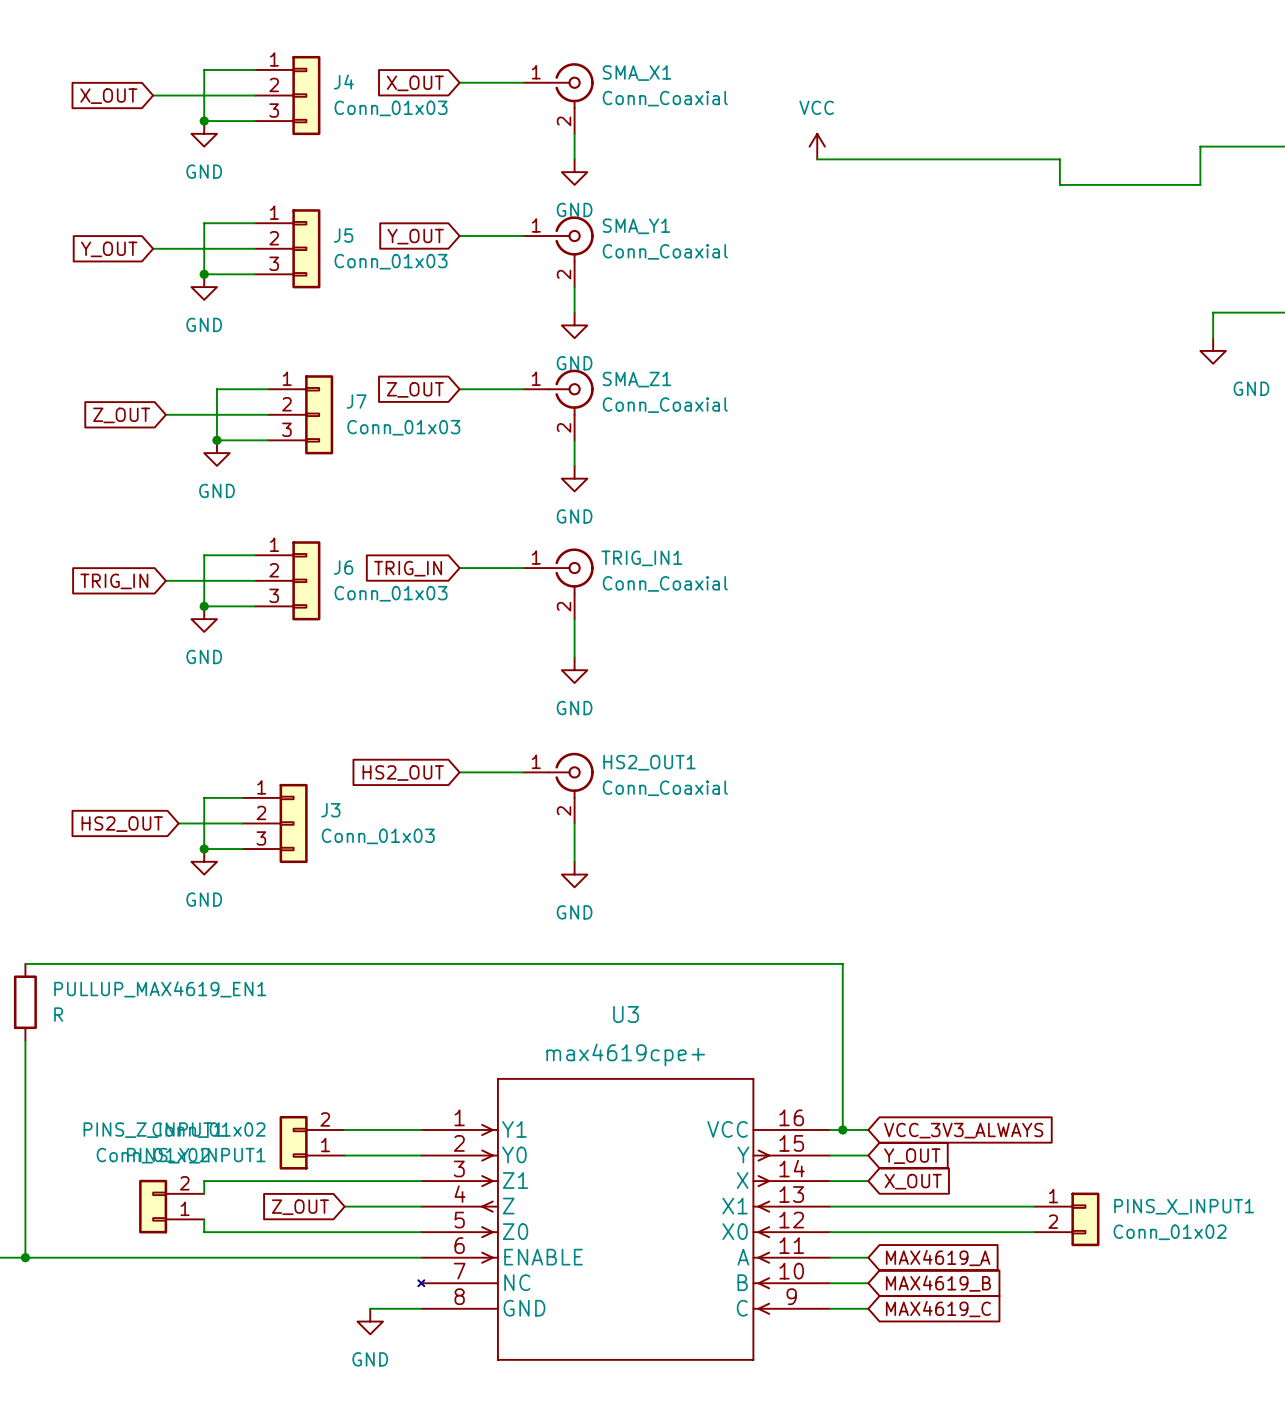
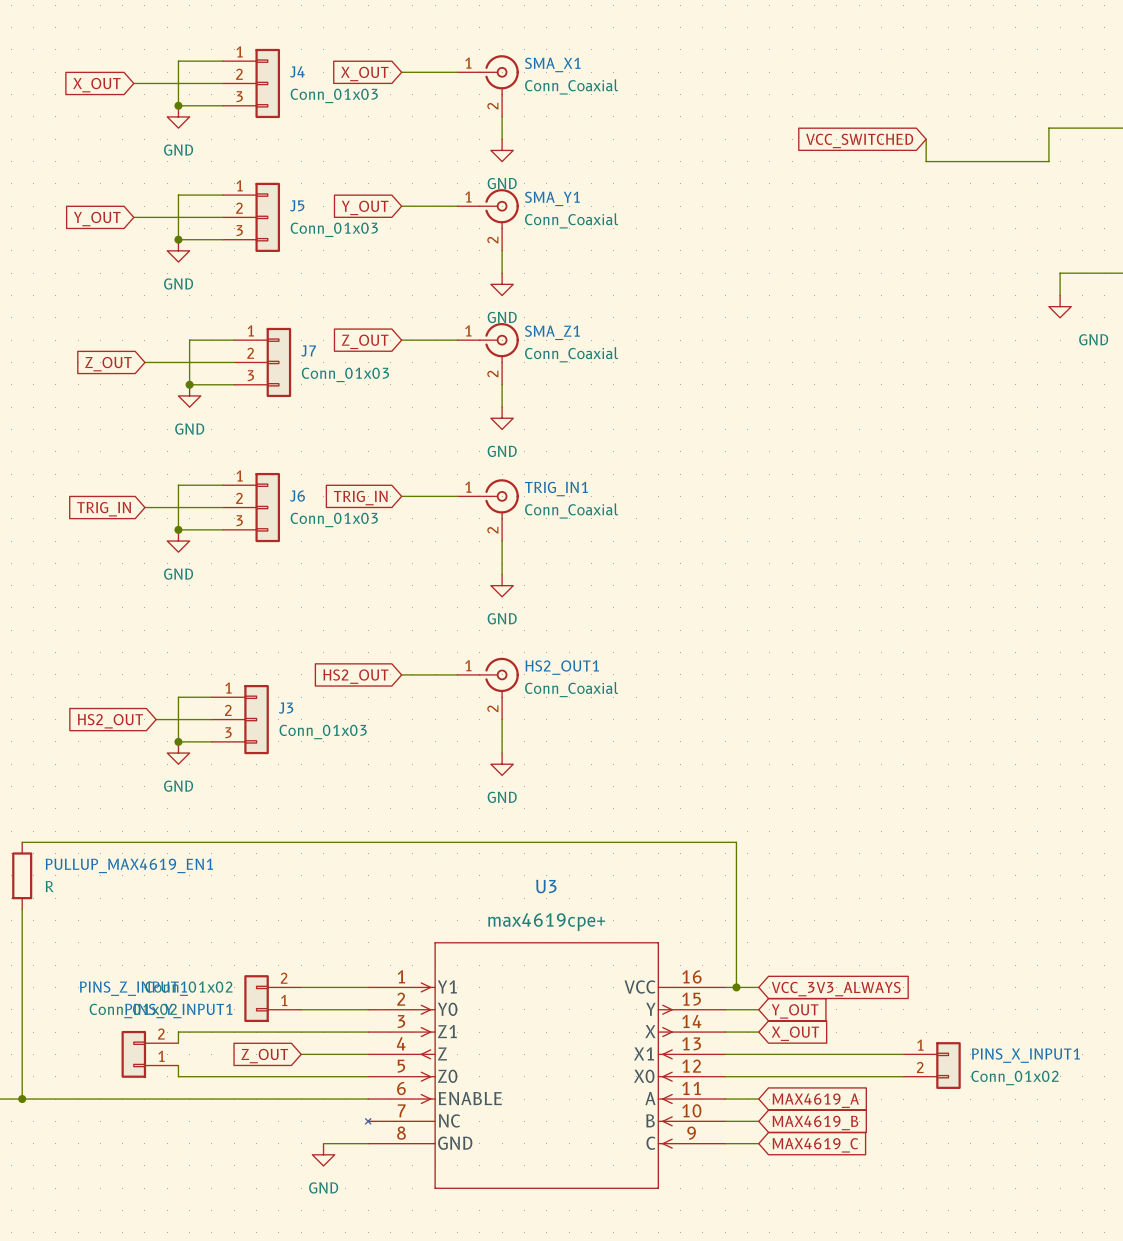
power symbol: VCC (817, 146) -> none
wire: (817, 159) (1059, 159) -> none
global label: none -> VCC_SWITCHED (859, 140)

